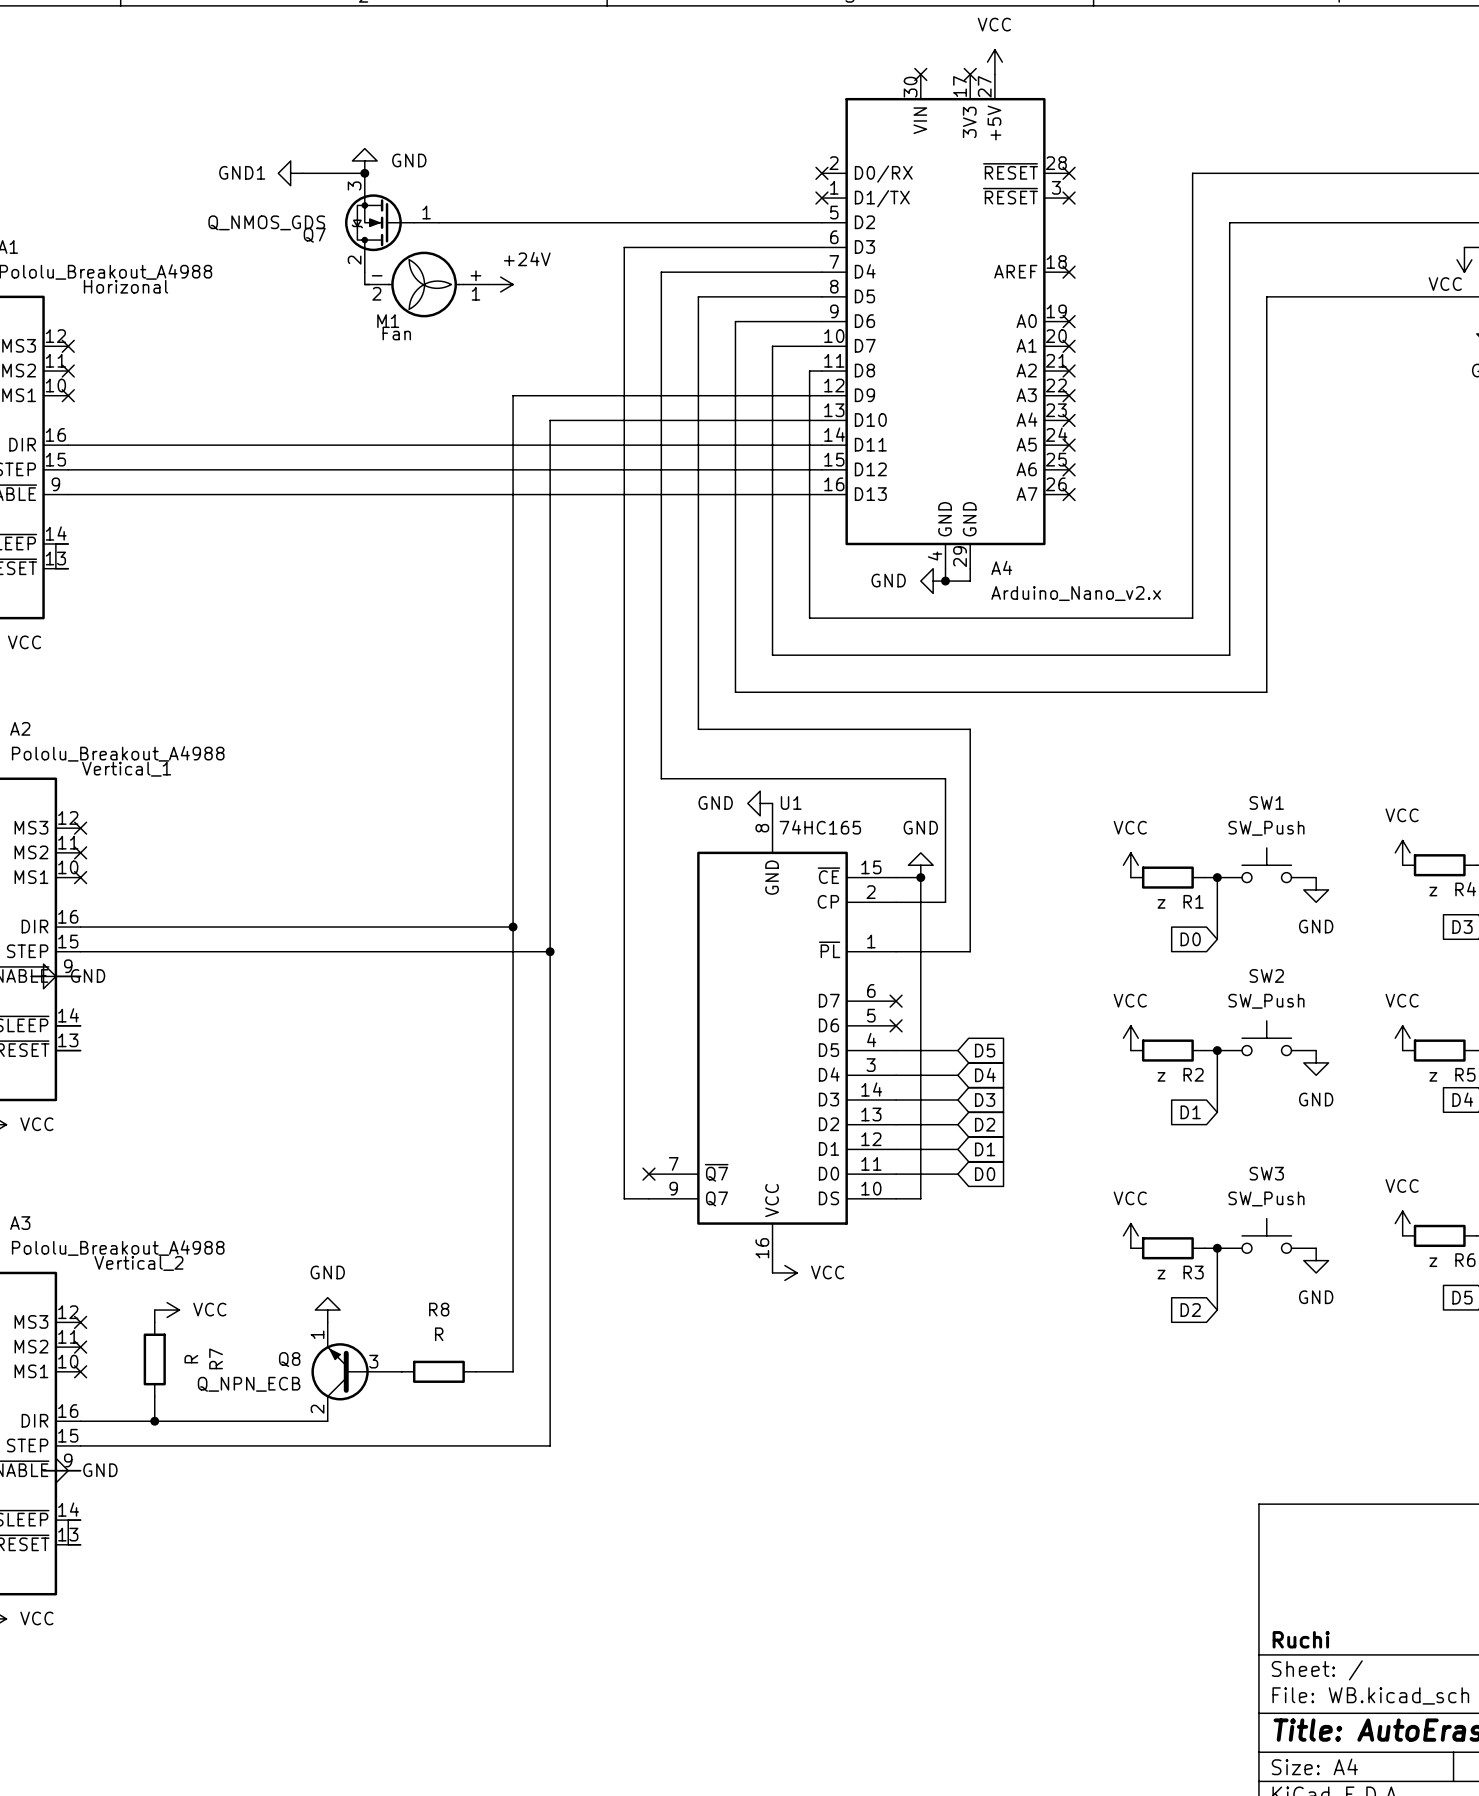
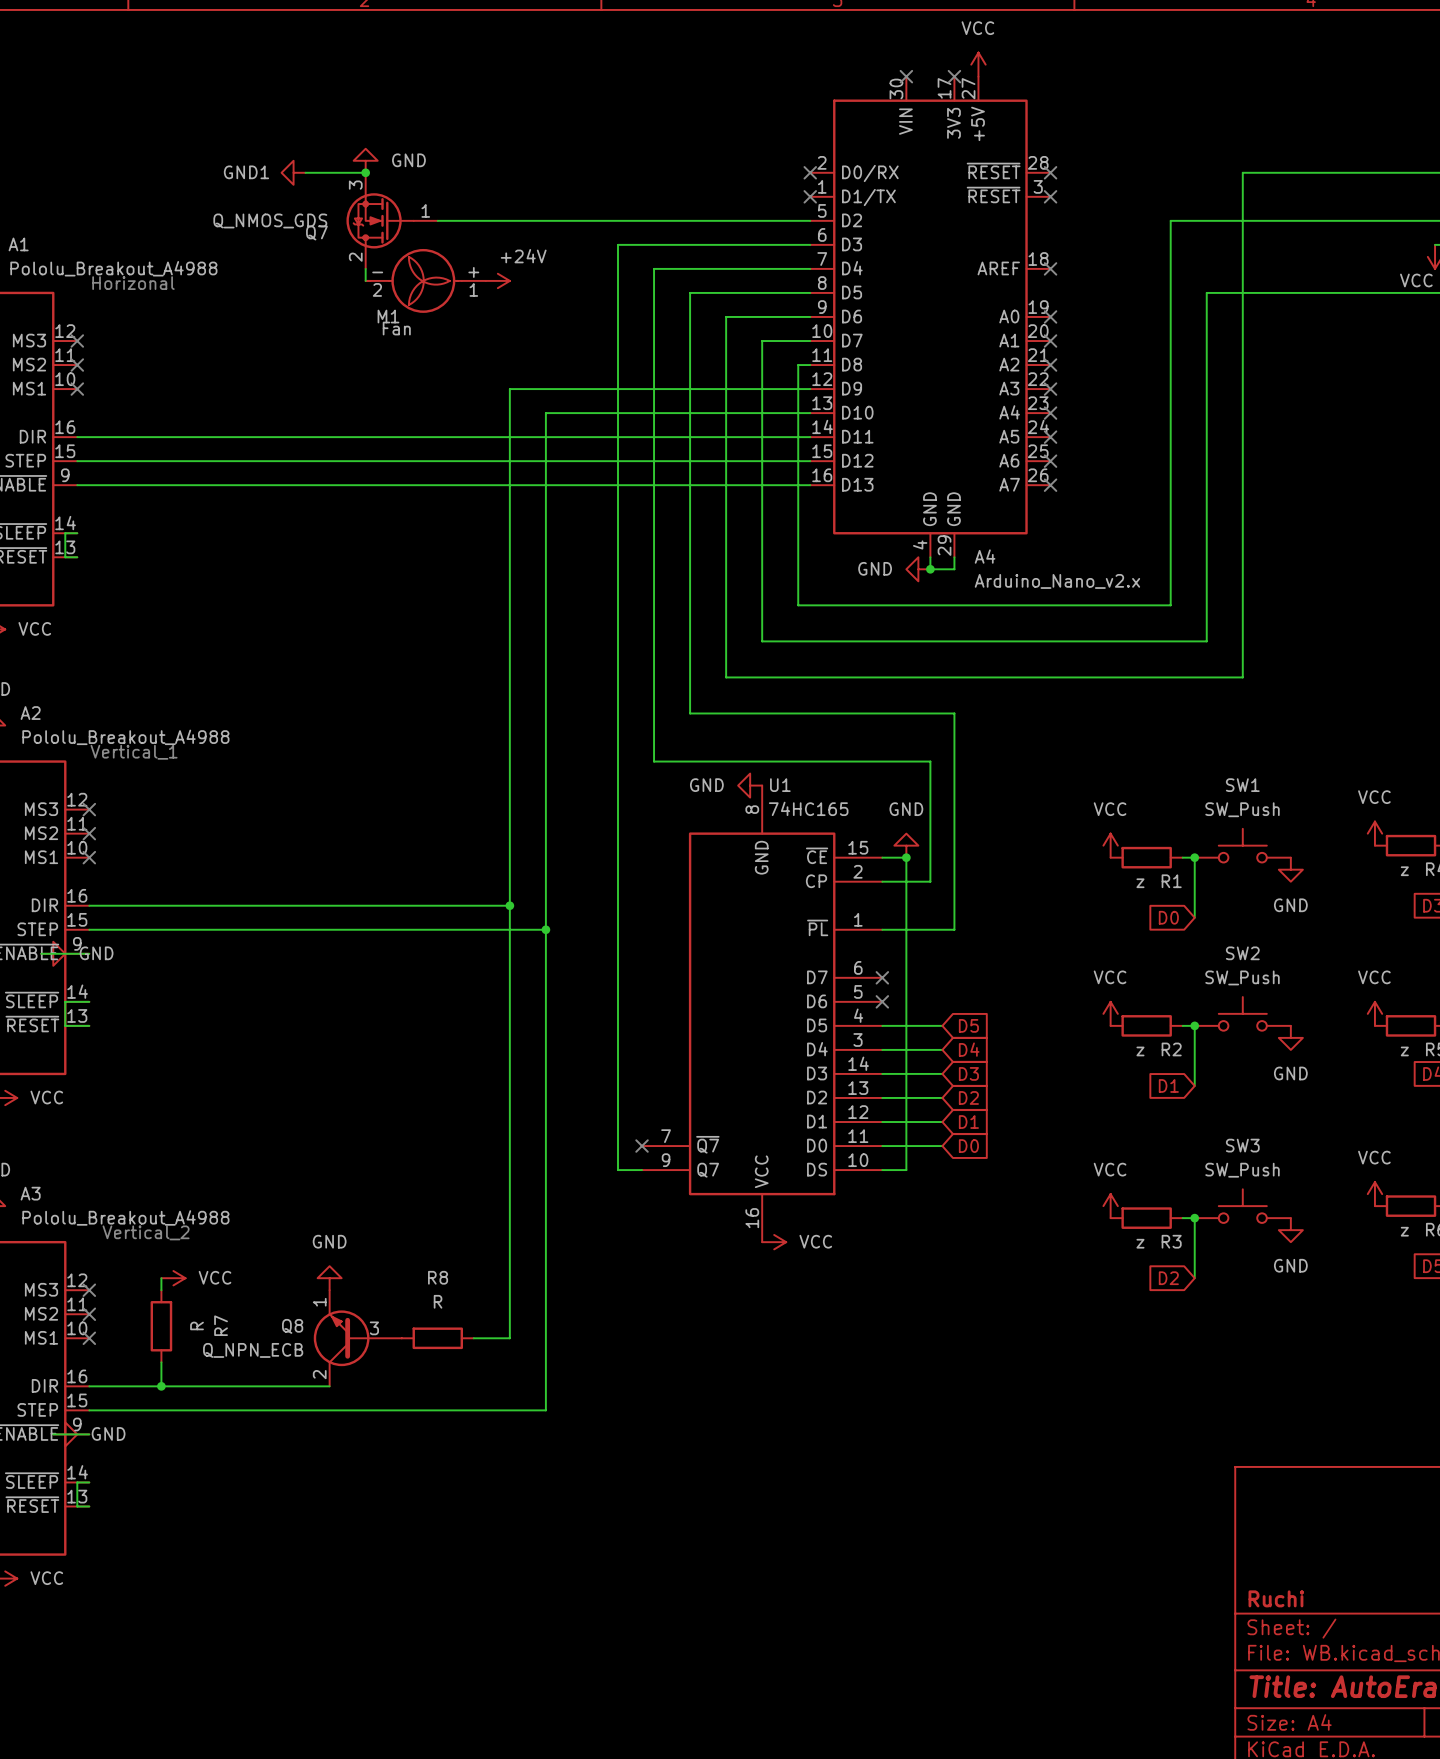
wire: (1266, 173) (1192, 173) (1192, 222) -> (1206, 220) (1170, 220)
wire: (1229, 222) (1229, 296) -> (1242, 172) (1242, 292) (1206, 292)

